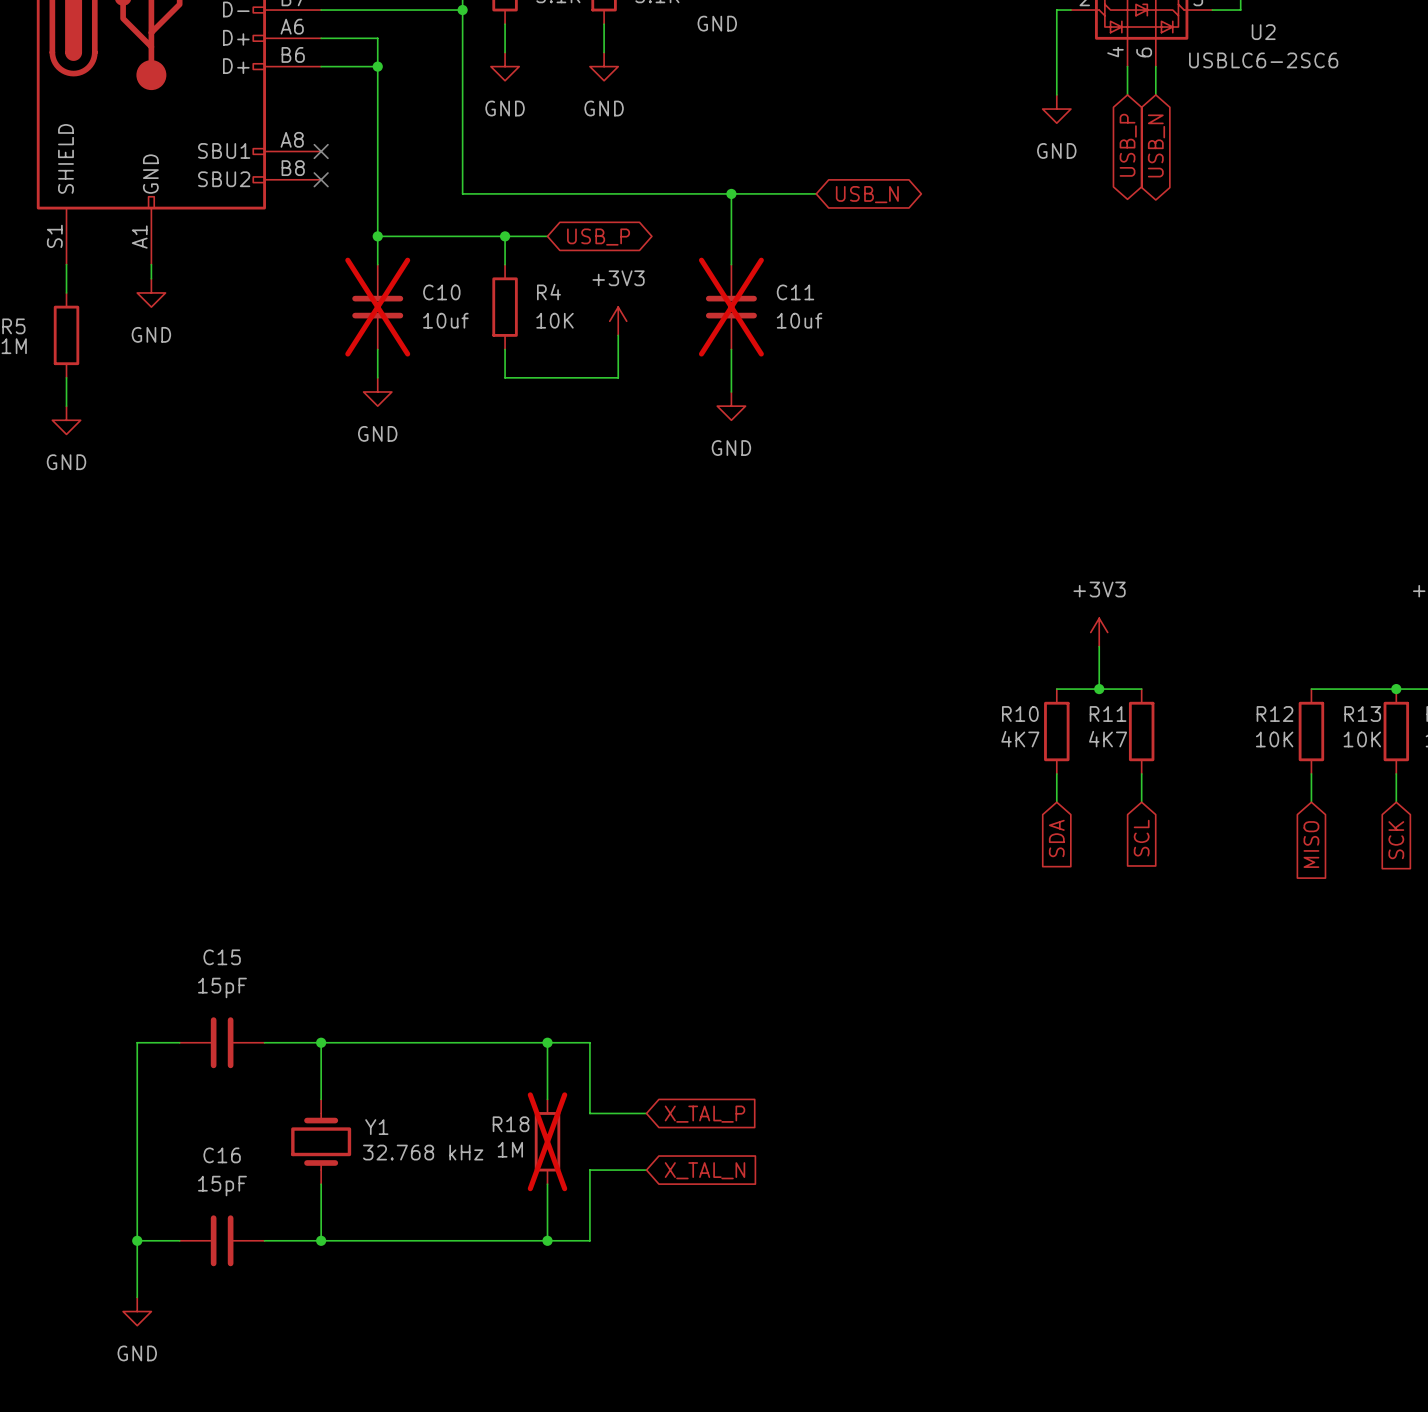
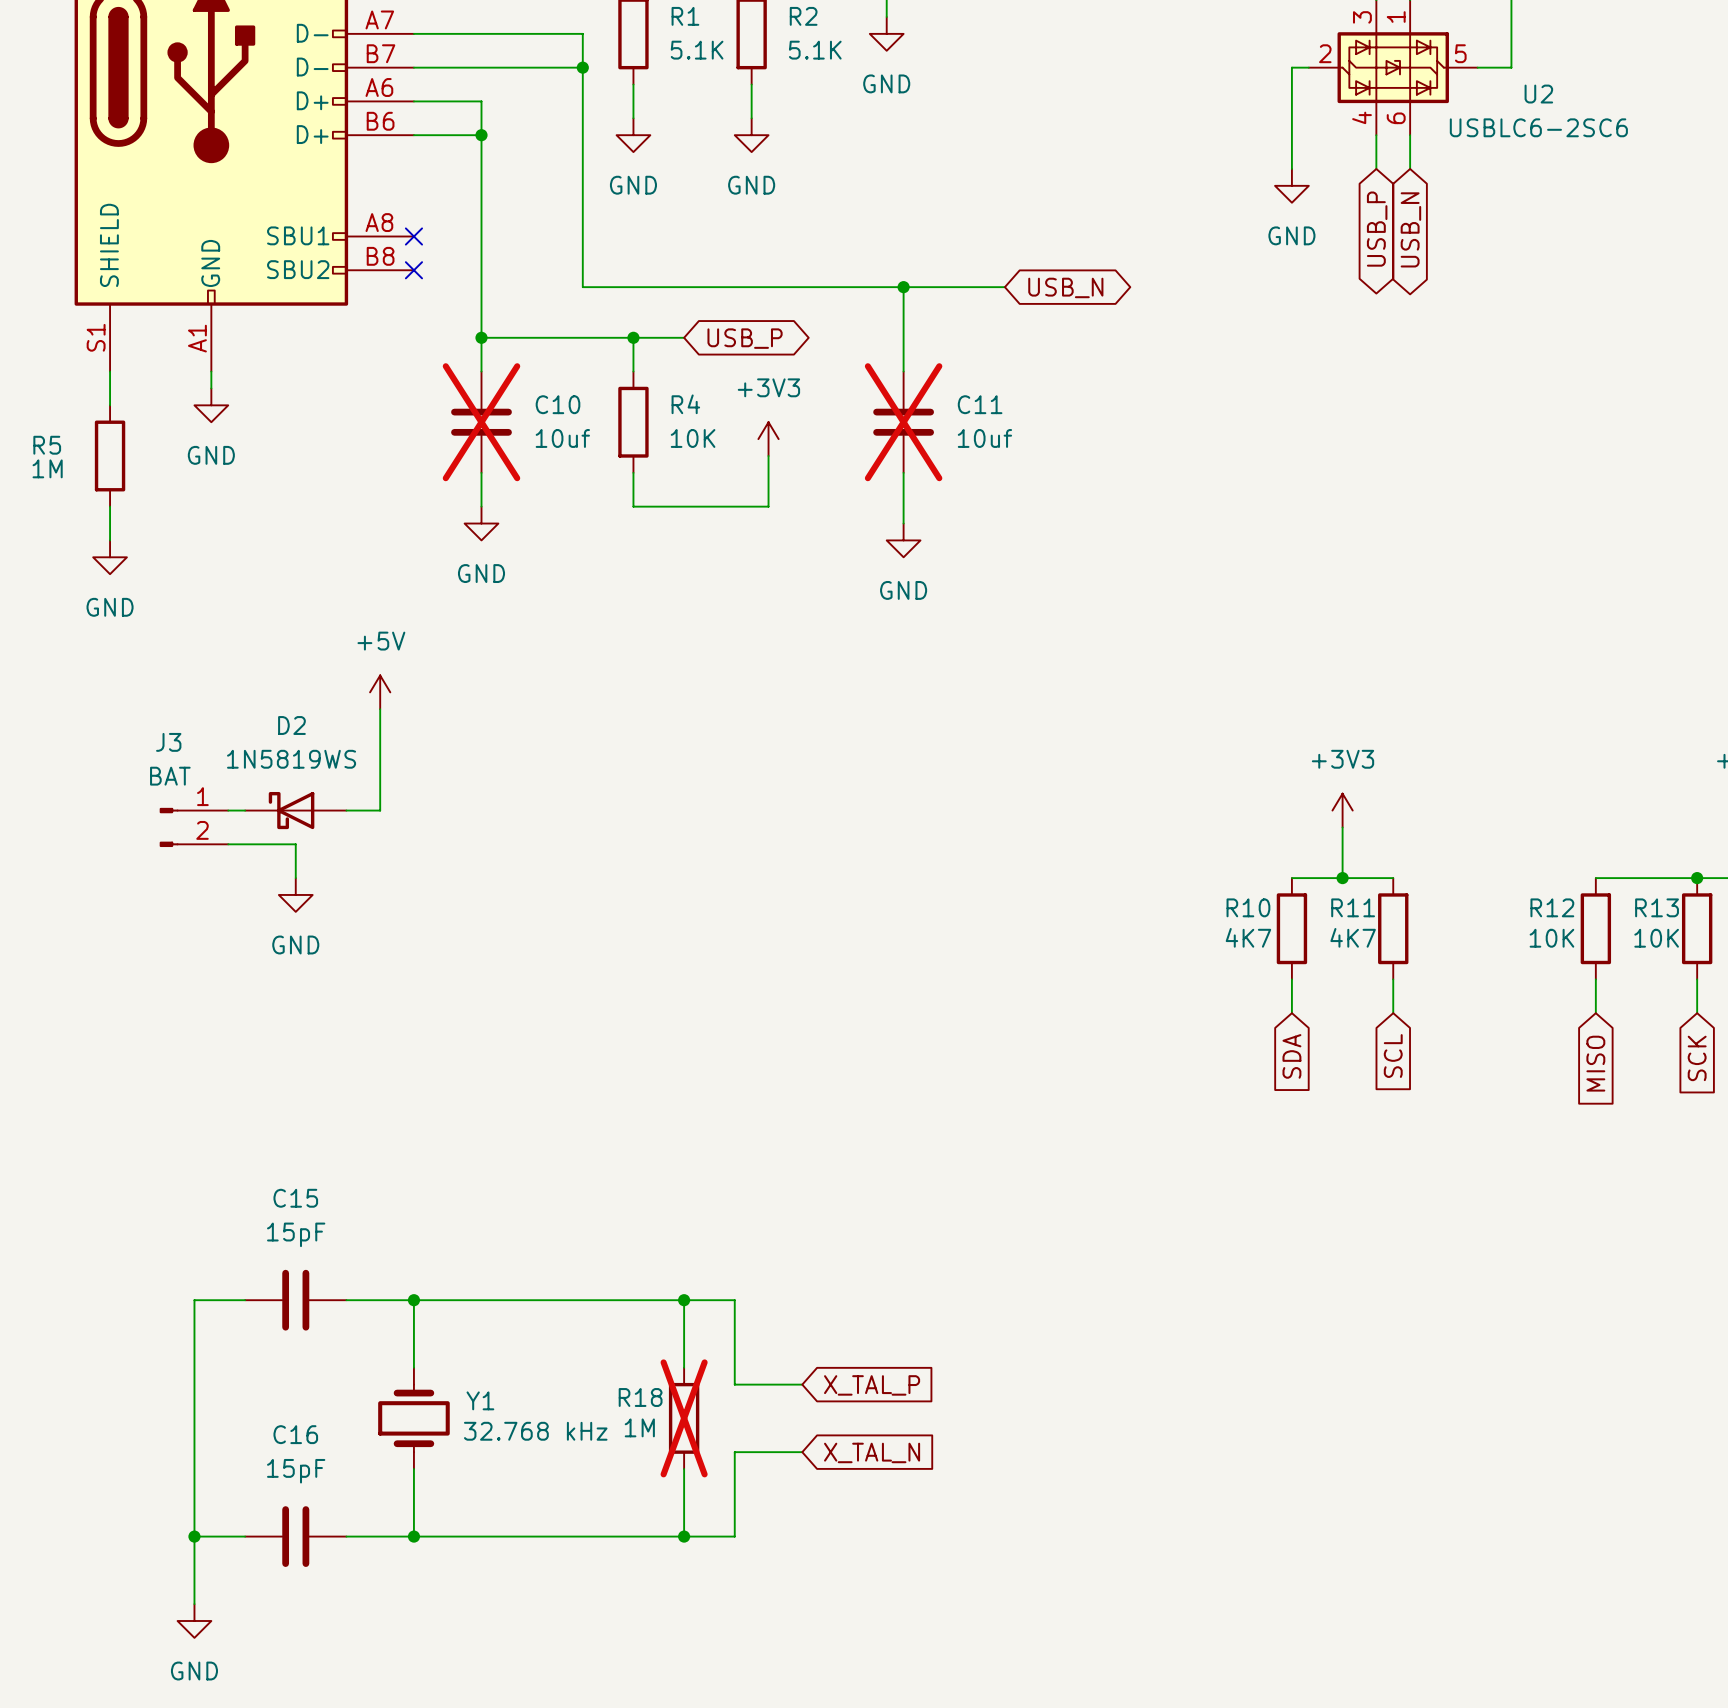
power symbol: none -> +5V (380, 692)
wire: none -> (380, 709) (380, 810) (346, 810)
wire: none -> (228, 810) (245, 810)
D2: none -> 1N5819WS (295, 810)
J3: none -> BAT (193, 827)
wire: none -> (228, 844) (295, 844) (295, 878)
power symbol: none -> GND (295, 894)

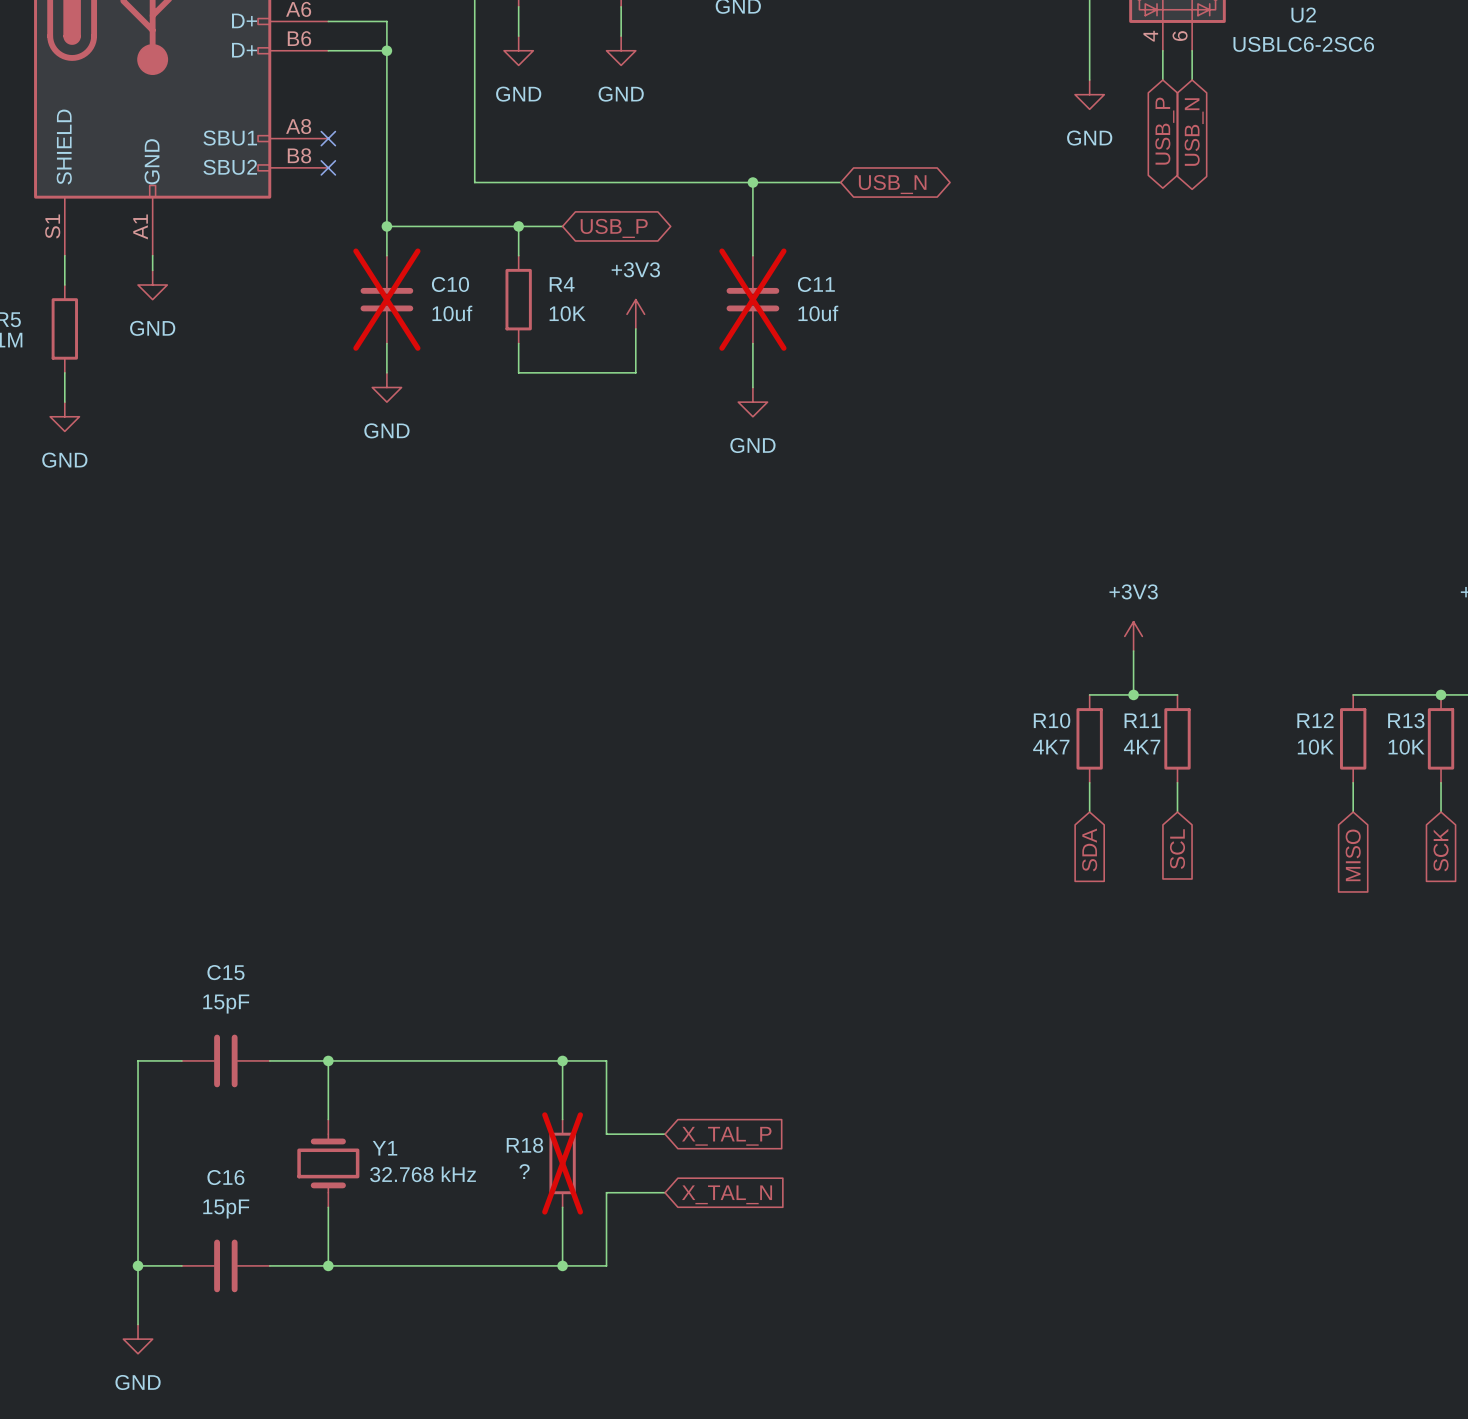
power symbol: +5V (380, 692) -> none
wire: (380, 709) (380, 810) (346, 810) -> none
wire: (228, 810) (245, 810) -> none
D2: 1N5819WS (295, 810) -> none
J3: BAT (193, 827) -> none
wire: (228, 844) (295, 844) (295, 878) -> none
power symbol: GND (295, 894) -> none
R18 value: 1M (639, 1427) -> ? (524, 1171)

